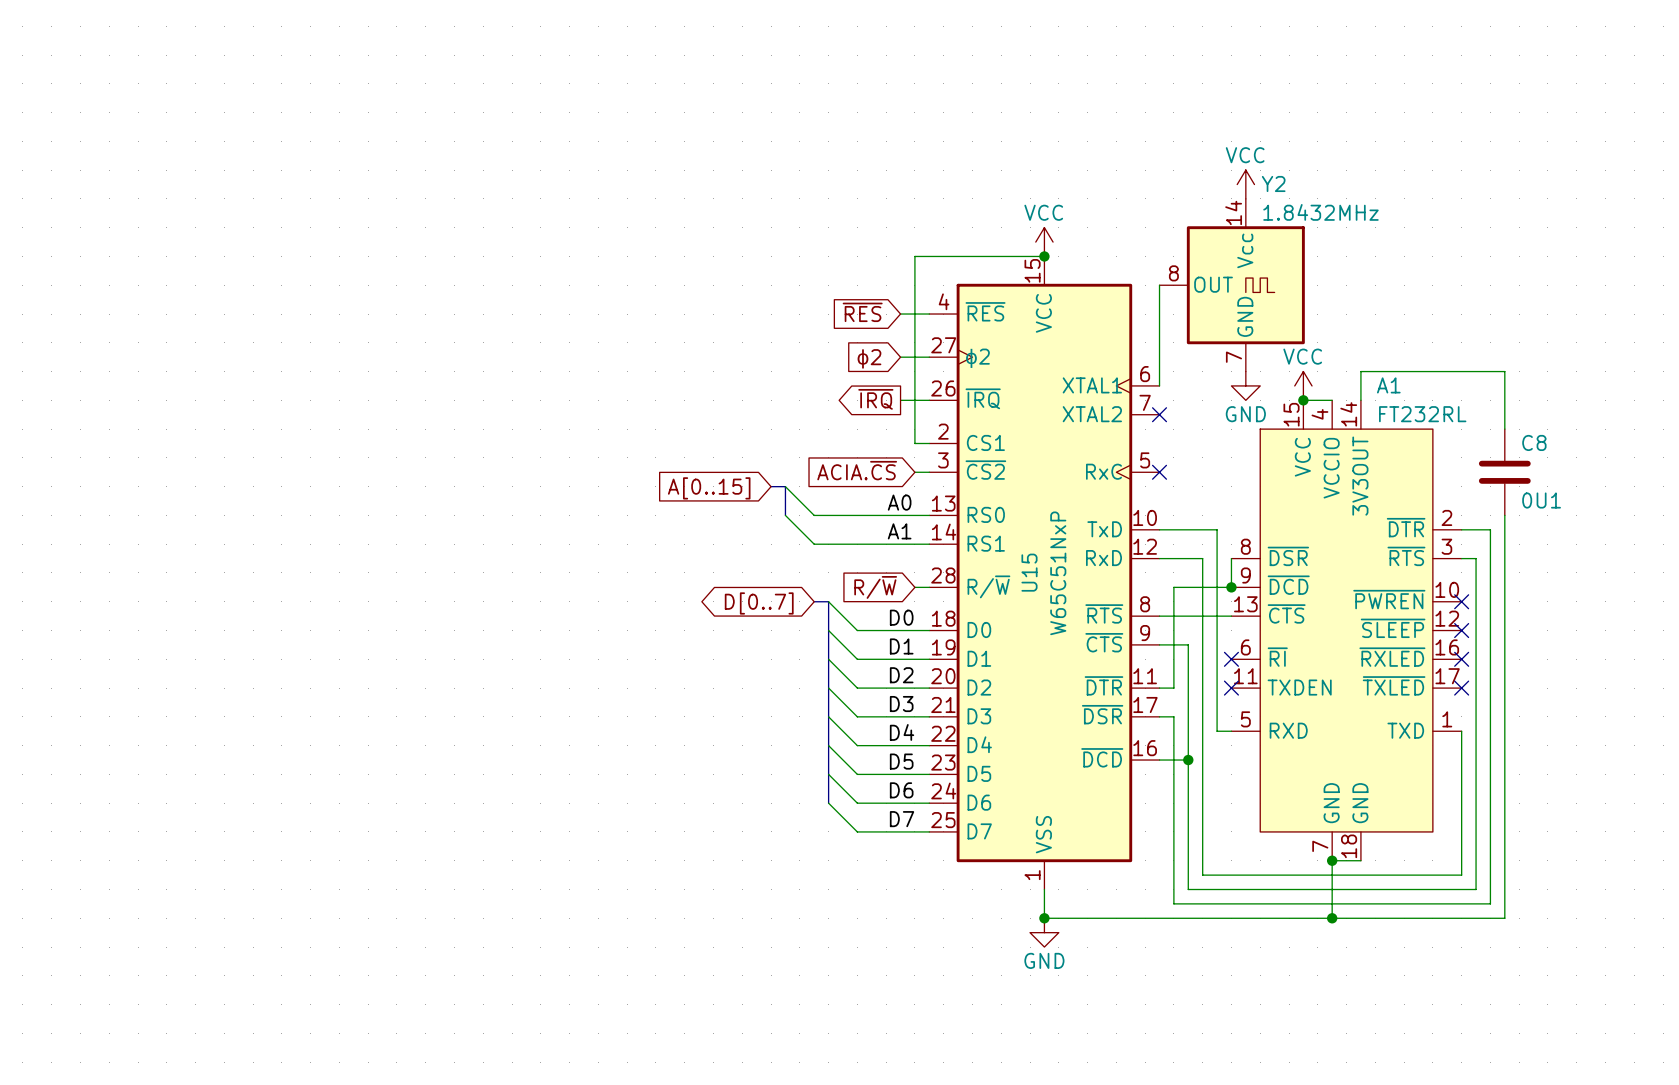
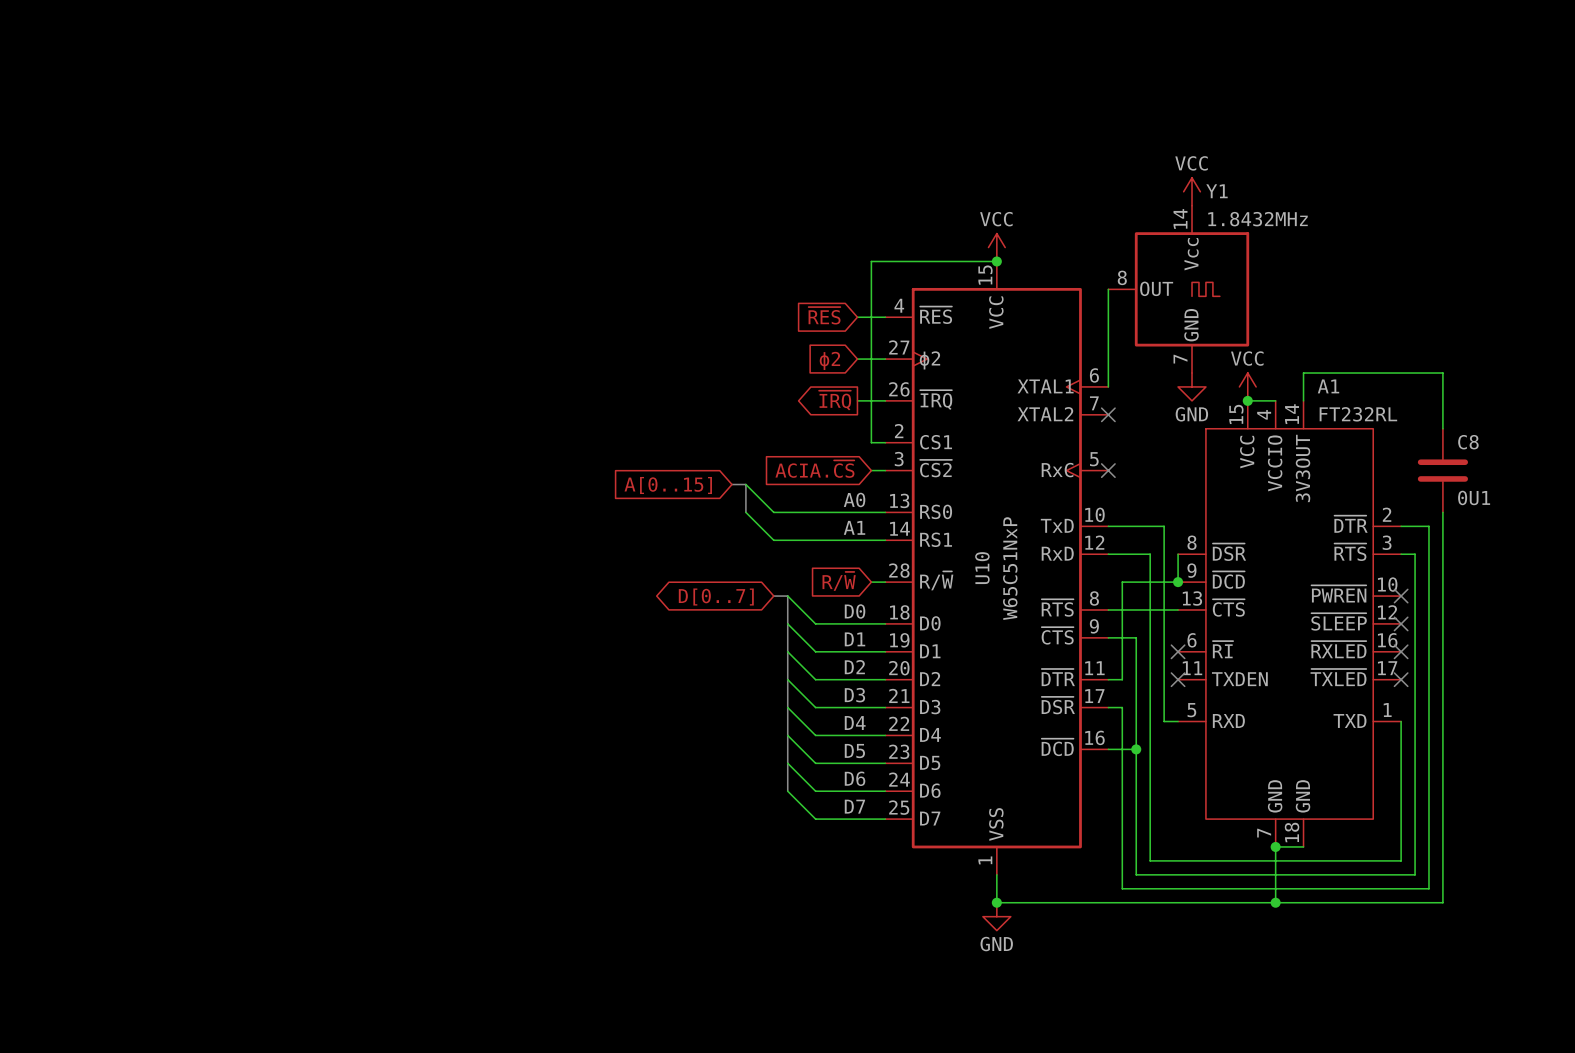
Y2 name: Y2 (1273, 183) -> Y1 (1216, 191)
U15 name: U15 (1029, 572) -> U10 (982, 568)

